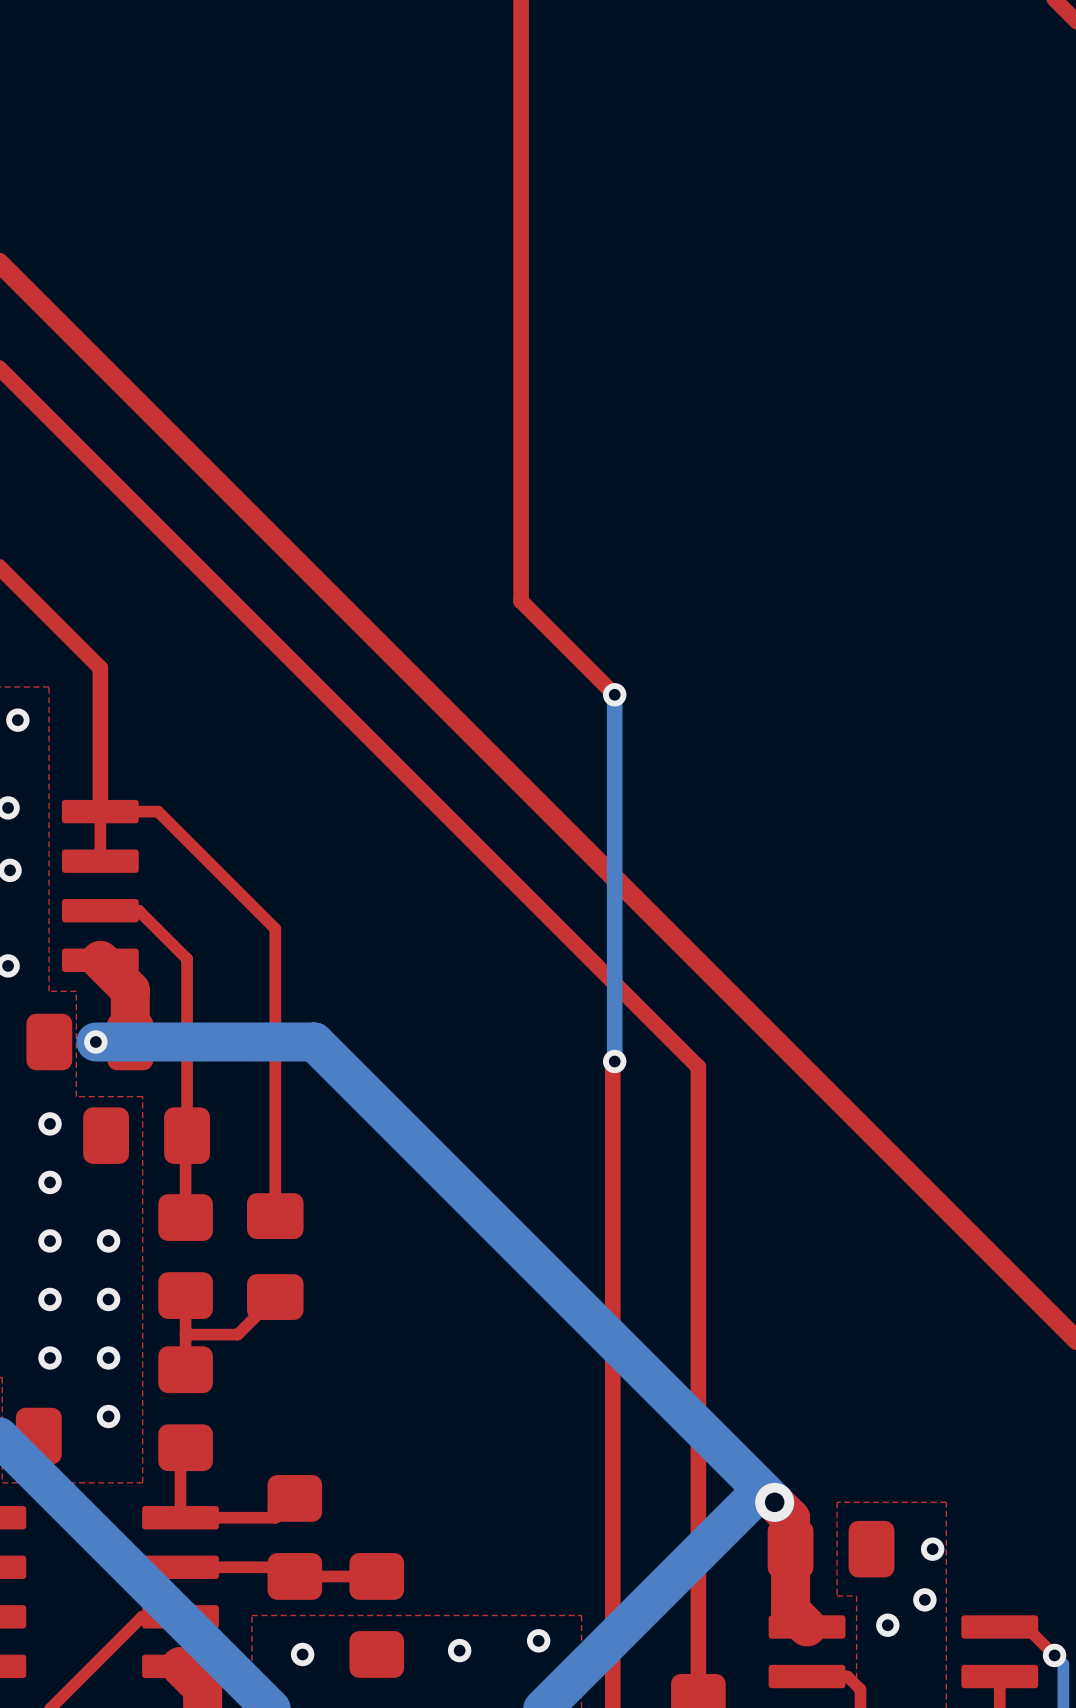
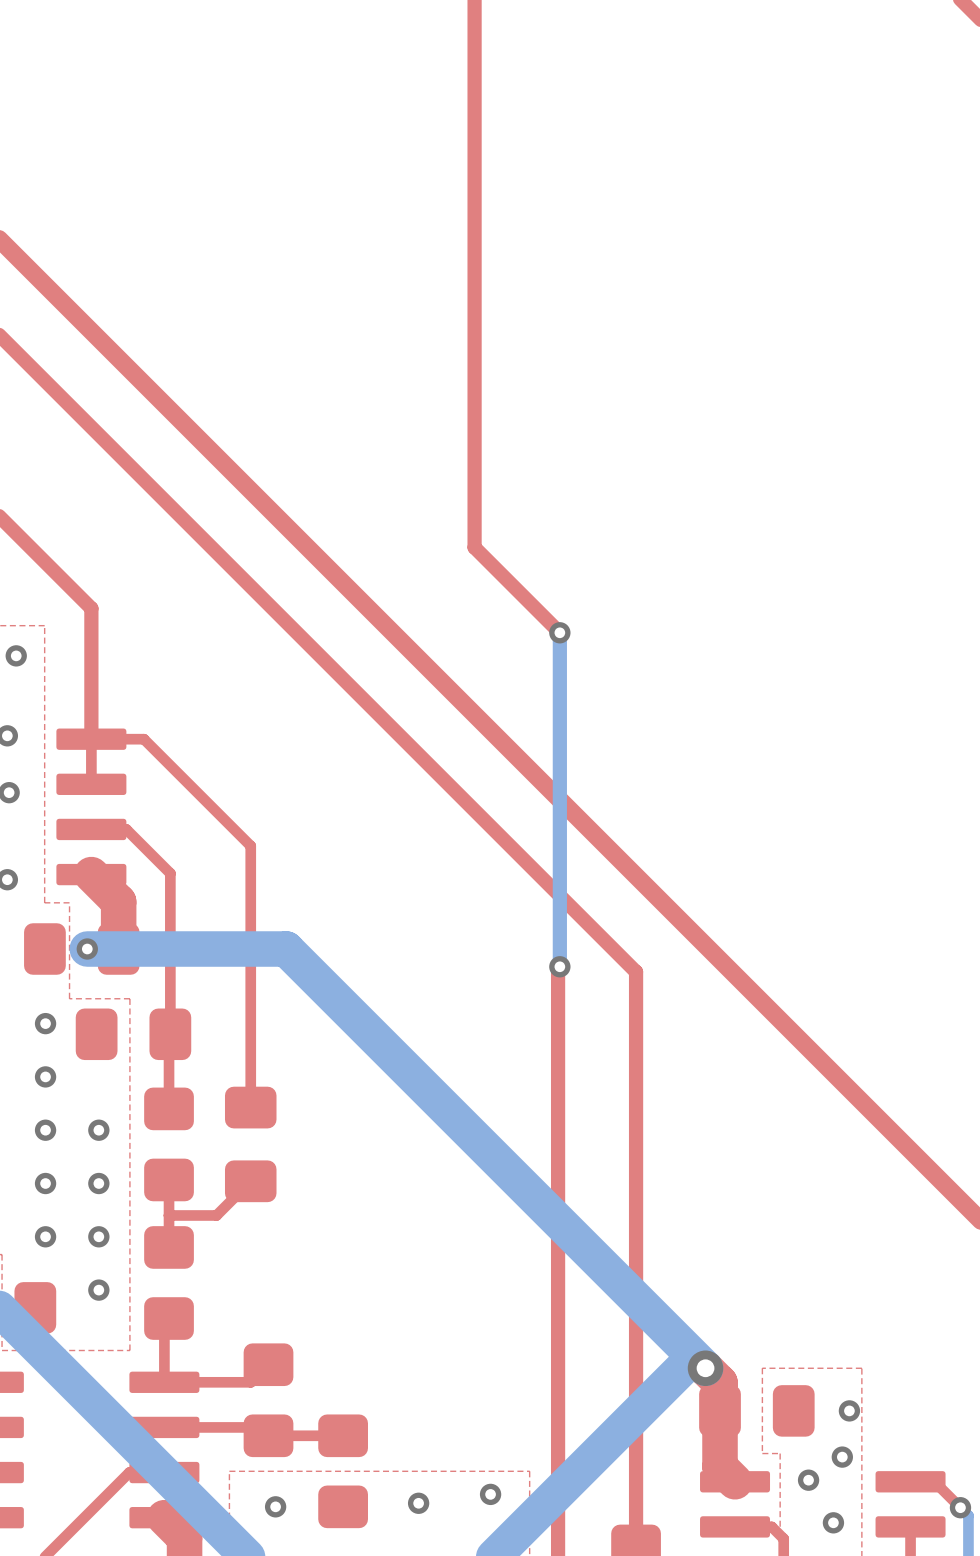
via: none -> (833, 1522)

